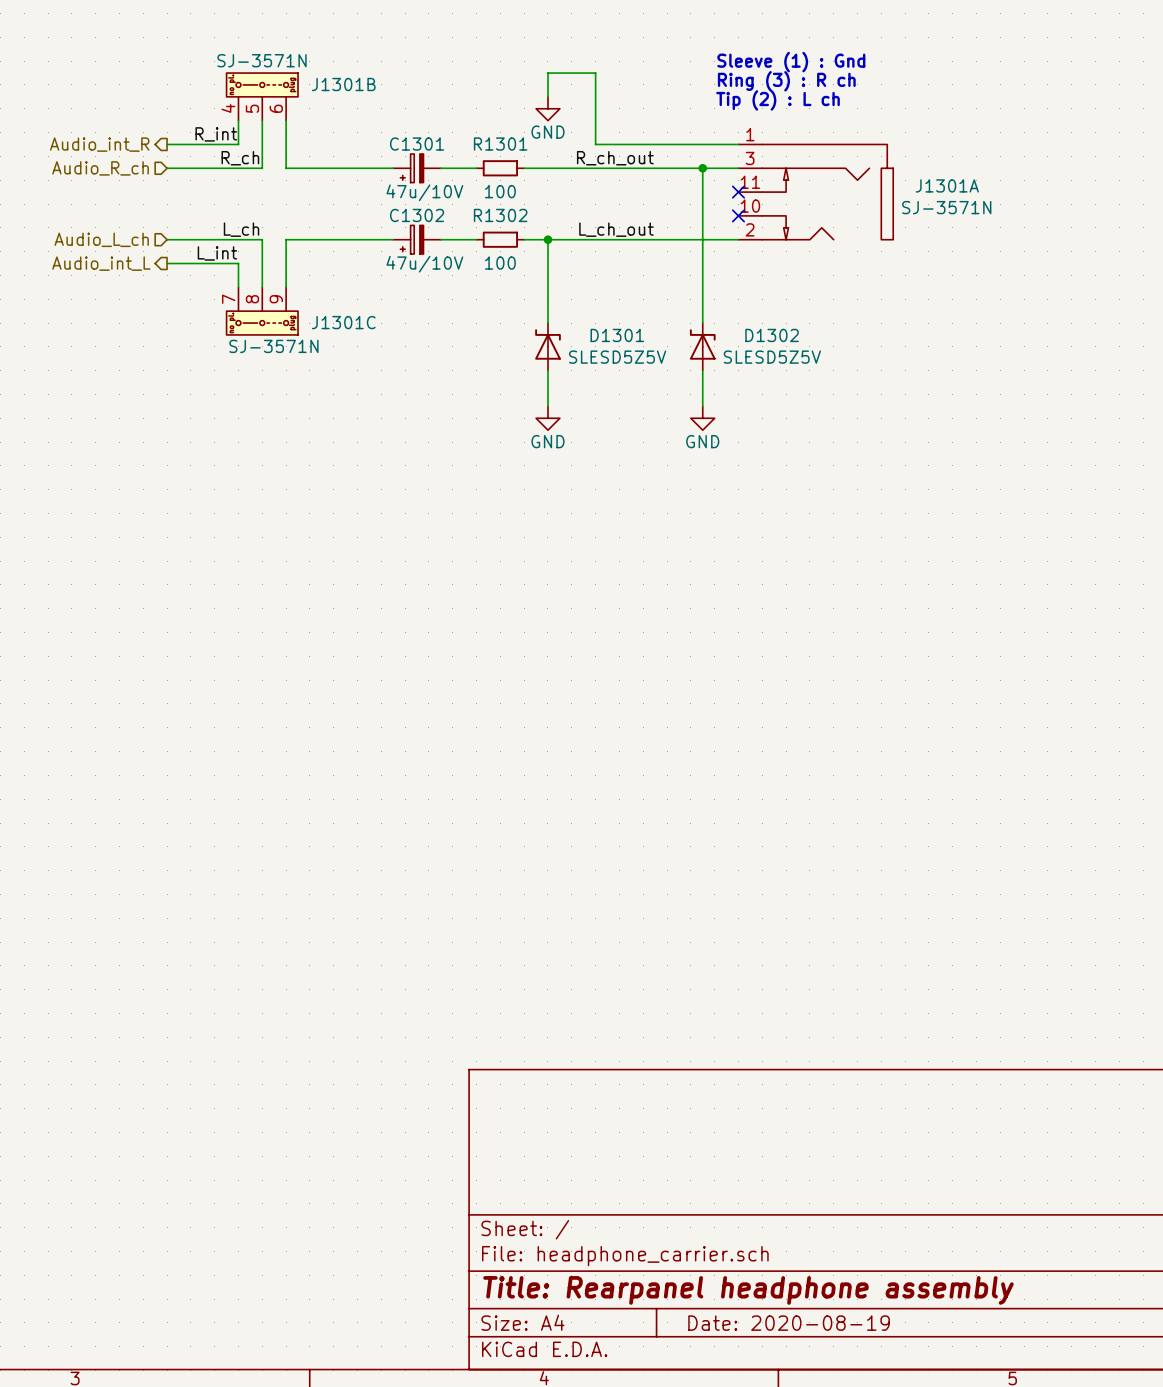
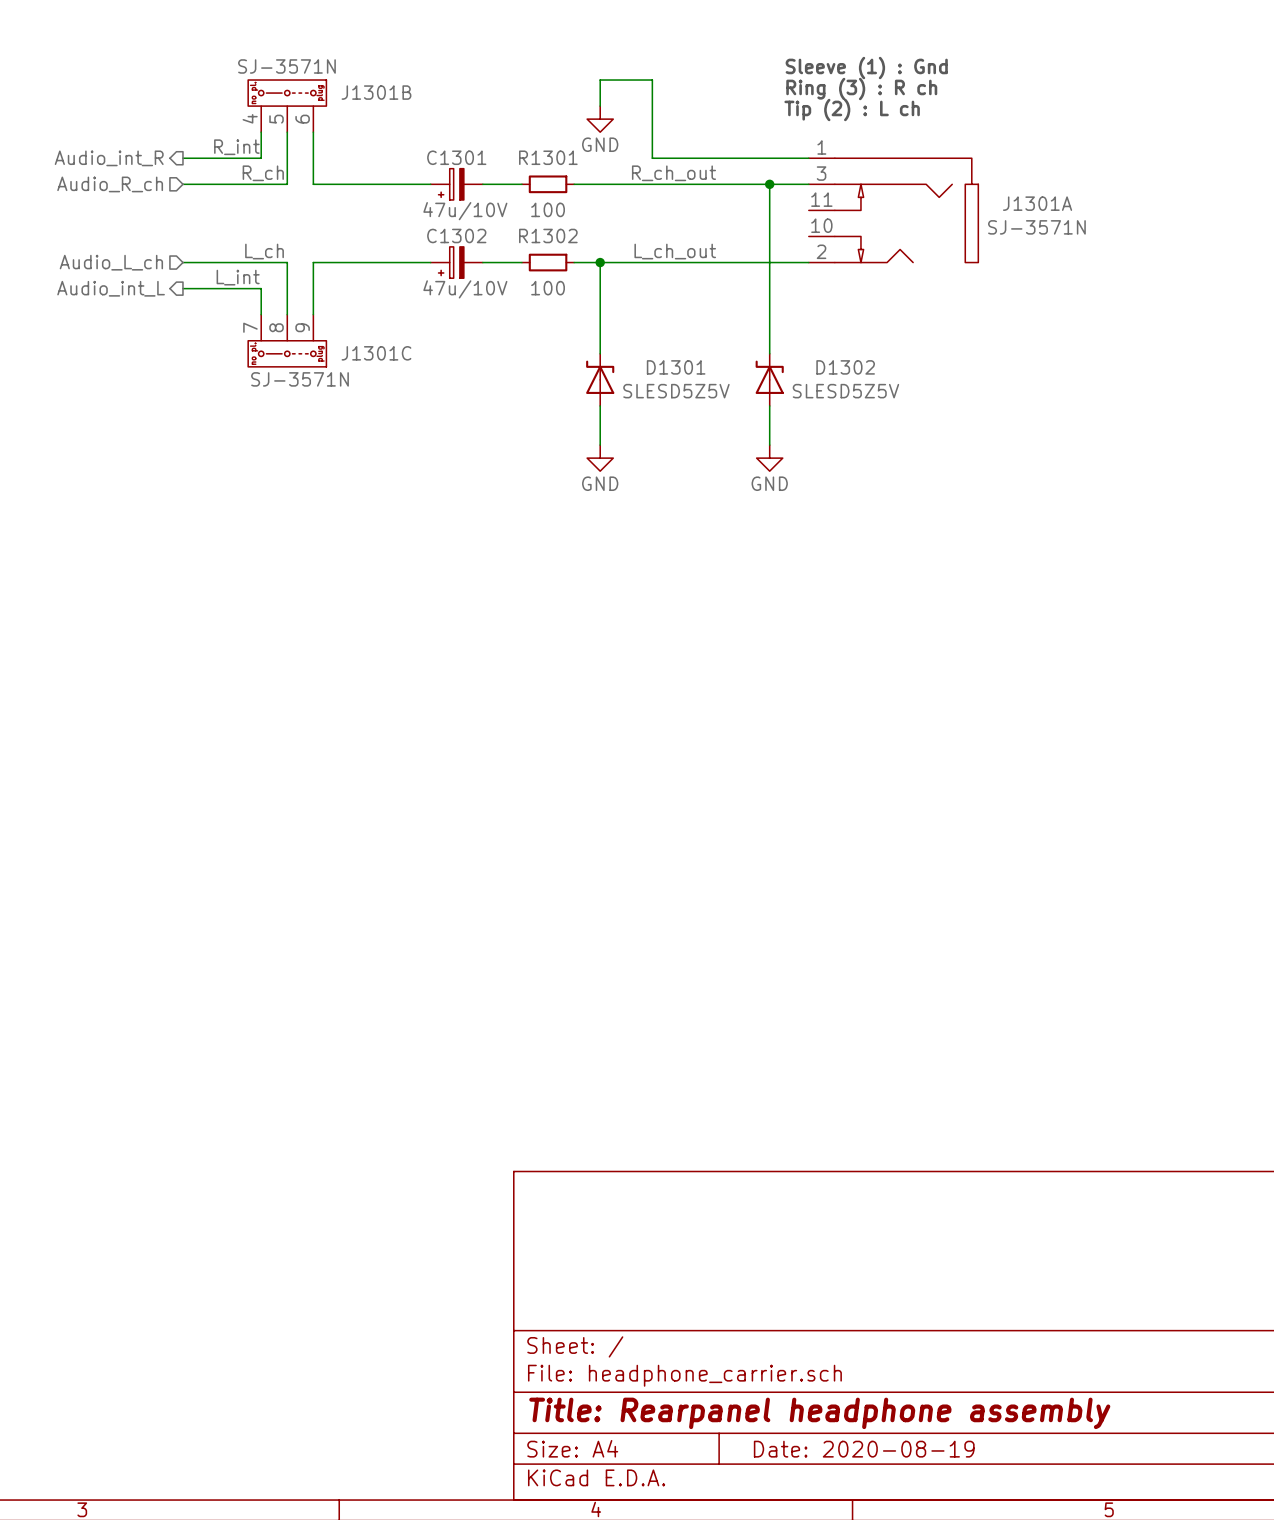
no-connect mark: (738, 192) -> none
no-connect mark: (738, 215) -> none

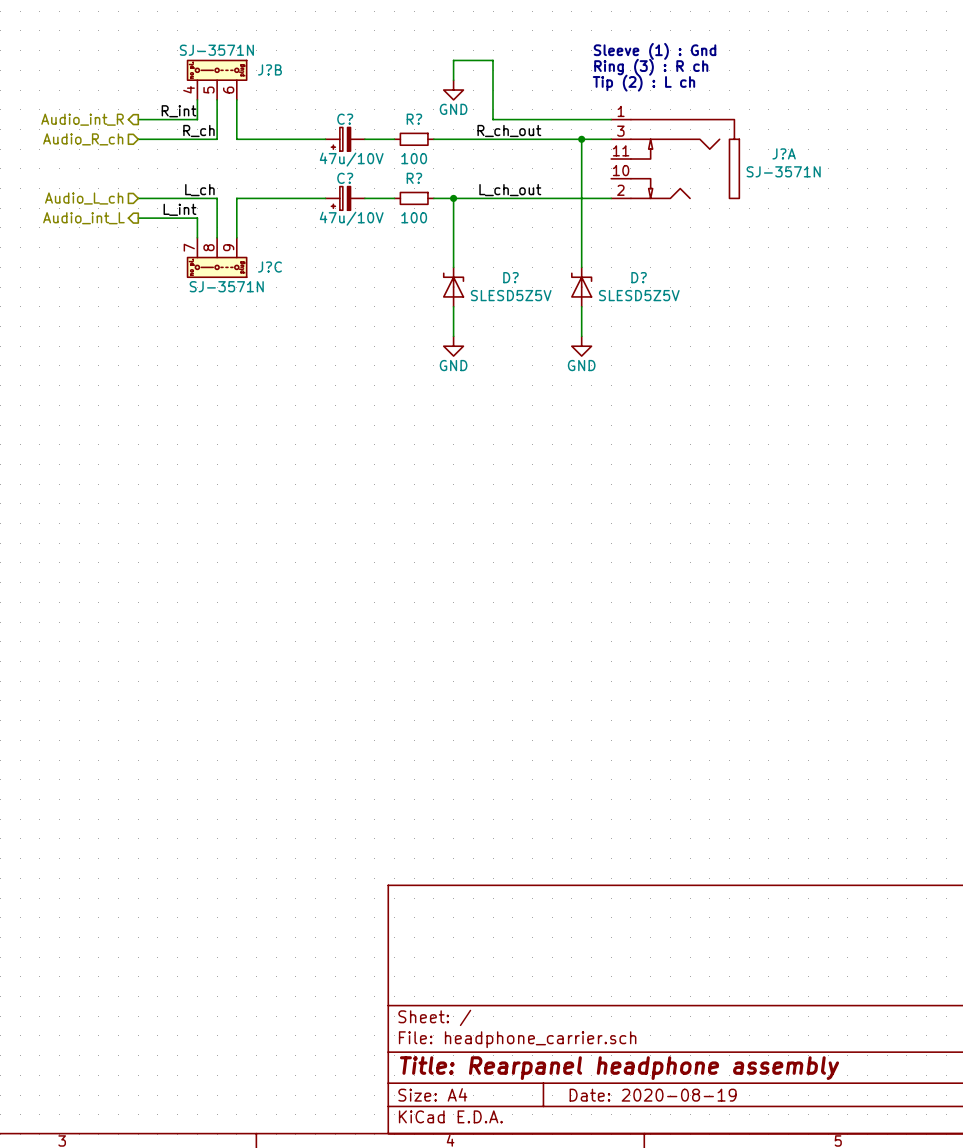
J1301B name: J1301B (376, 92) -> J?B (269, 69)
C1301 name: C1301 (456, 157) -> C? (345, 119)
R1301 name: R1301 (548, 157) -> R? (414, 119)
J1301A name: J1301A (1037, 203) -> J?A (784, 153)
C1302 name: C1302 (456, 235) -> C? (345, 178)
R1302 name: R1302 (548, 235) -> R? (414, 178)
J1301C name: J1301C (376, 353) -> J?C (269, 267)
D1301 name: D1301 (676, 367) -> D? (510, 277)
D1302 name: D1302 (845, 367) -> D? (639, 277)

